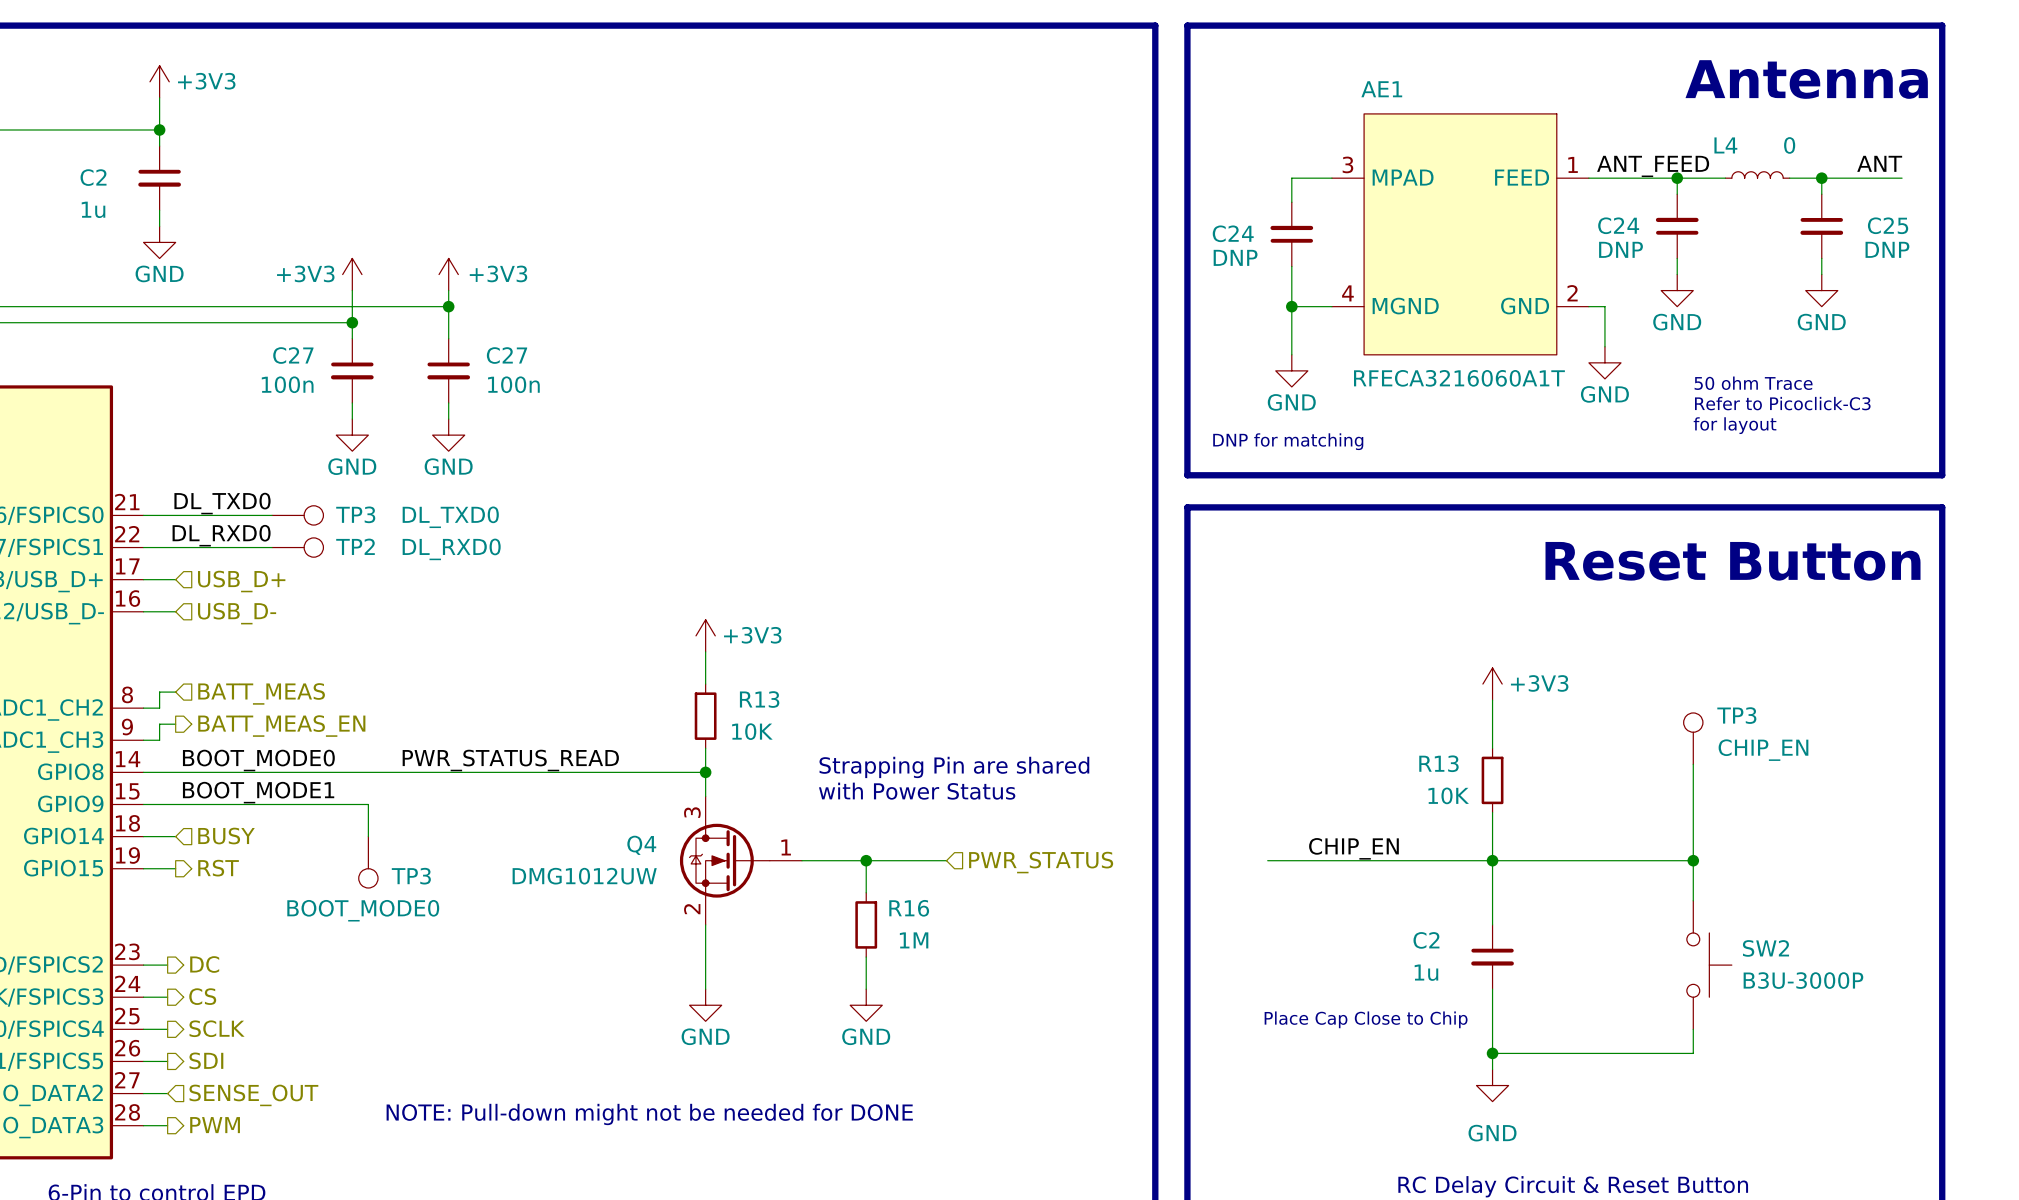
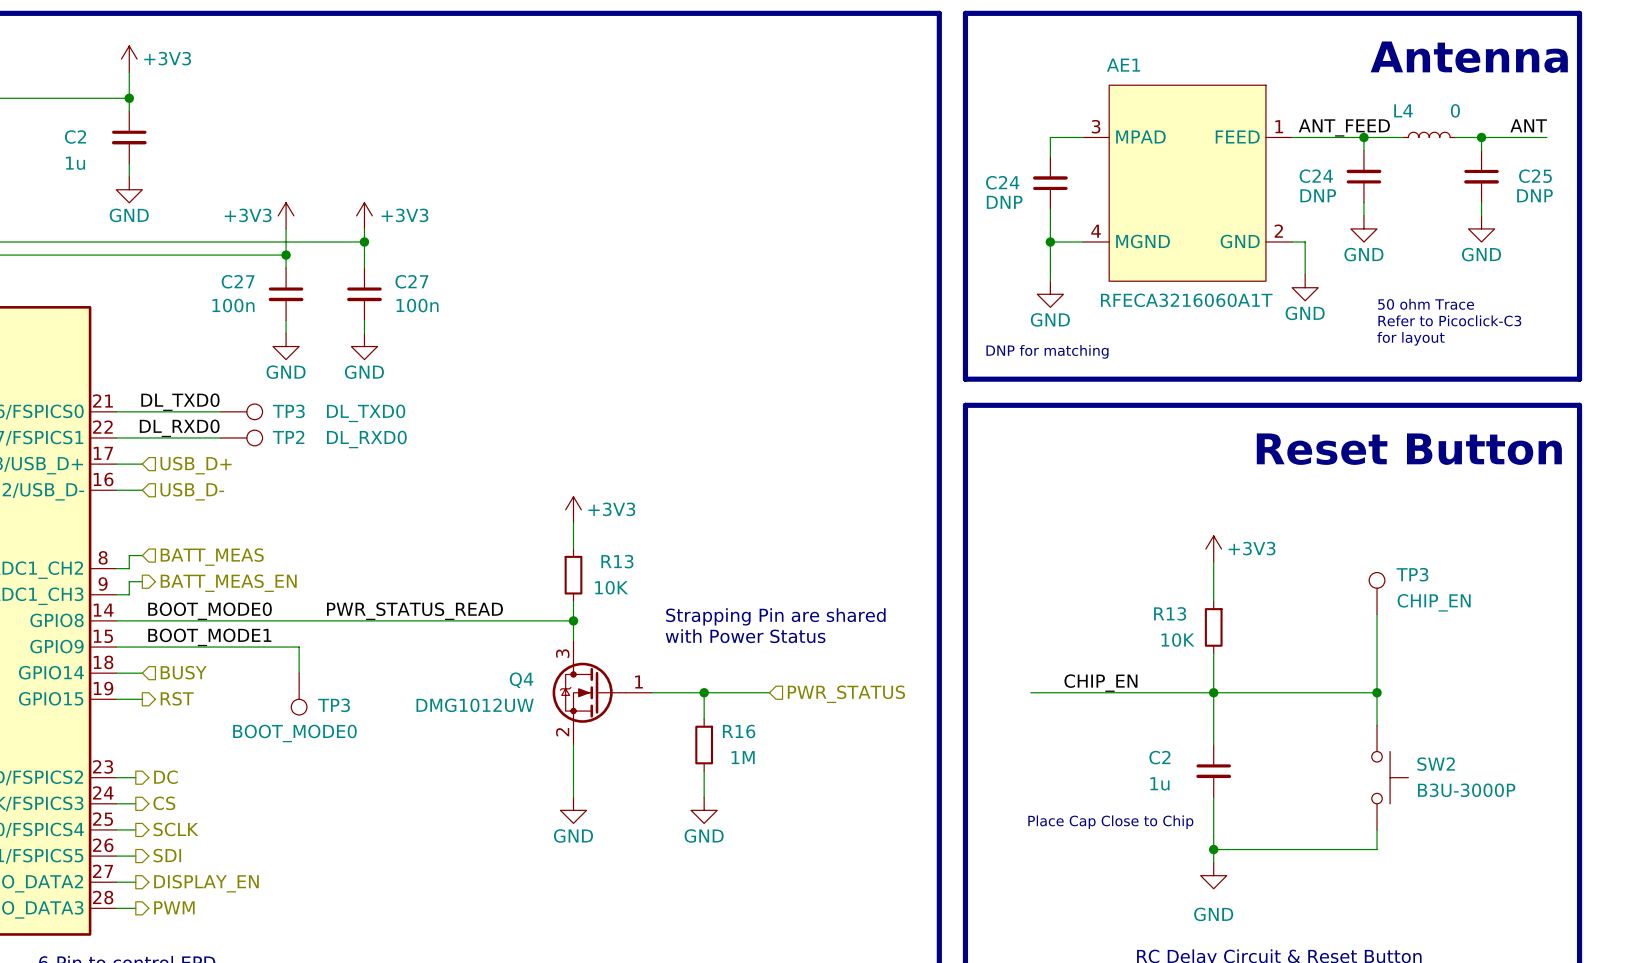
hierarchical label shape: input (253, 1095) -> output (206, 883)
hierarchical label: SENSE_OUT (253, 1095) -> DISPLAY_EN (206, 883)
text: NOTE: Pull-down might not be needed for DONE (649, 1114) -> none

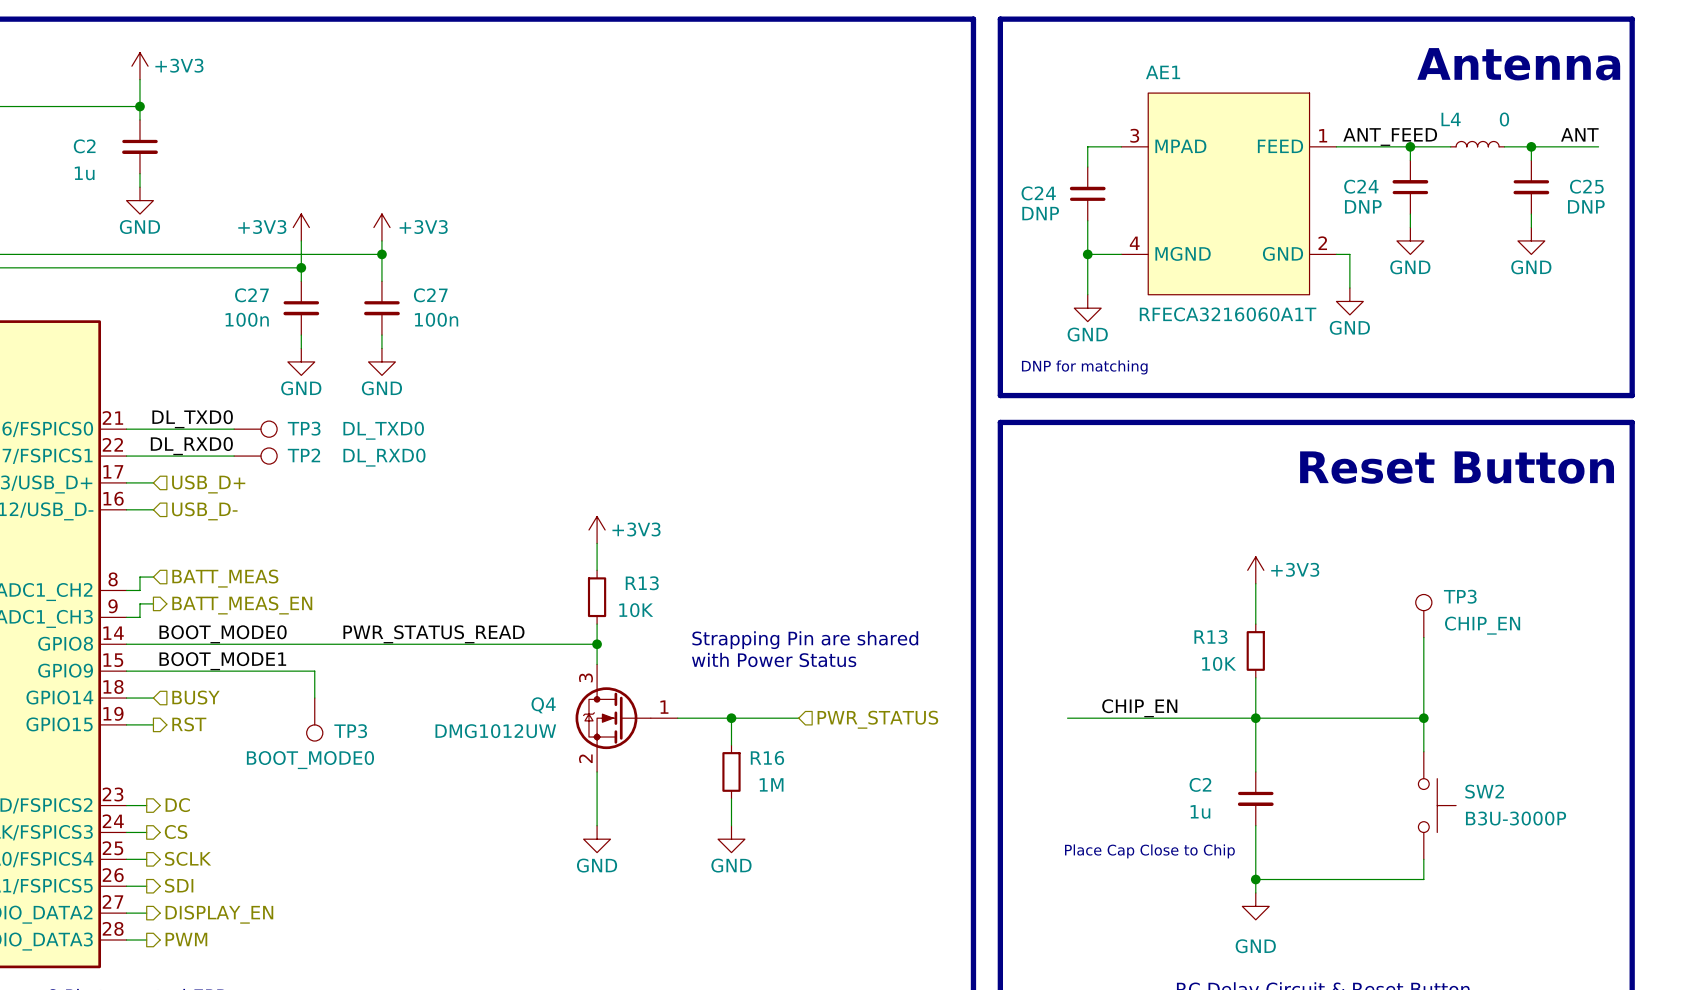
text: 50 ohm Trace (1426, 304) -> none
text: Refer to Picoclick-C3 (1449, 320) -> none
text: for layout (1410, 338) -> none

